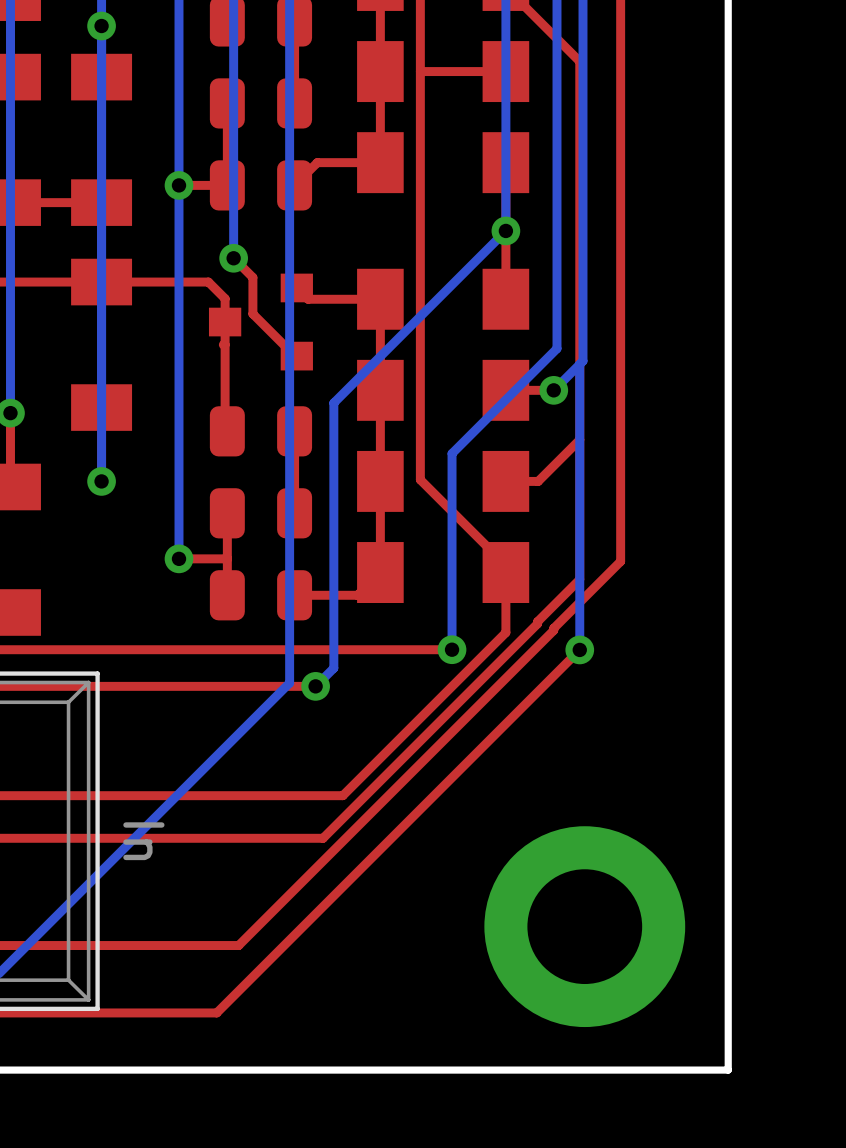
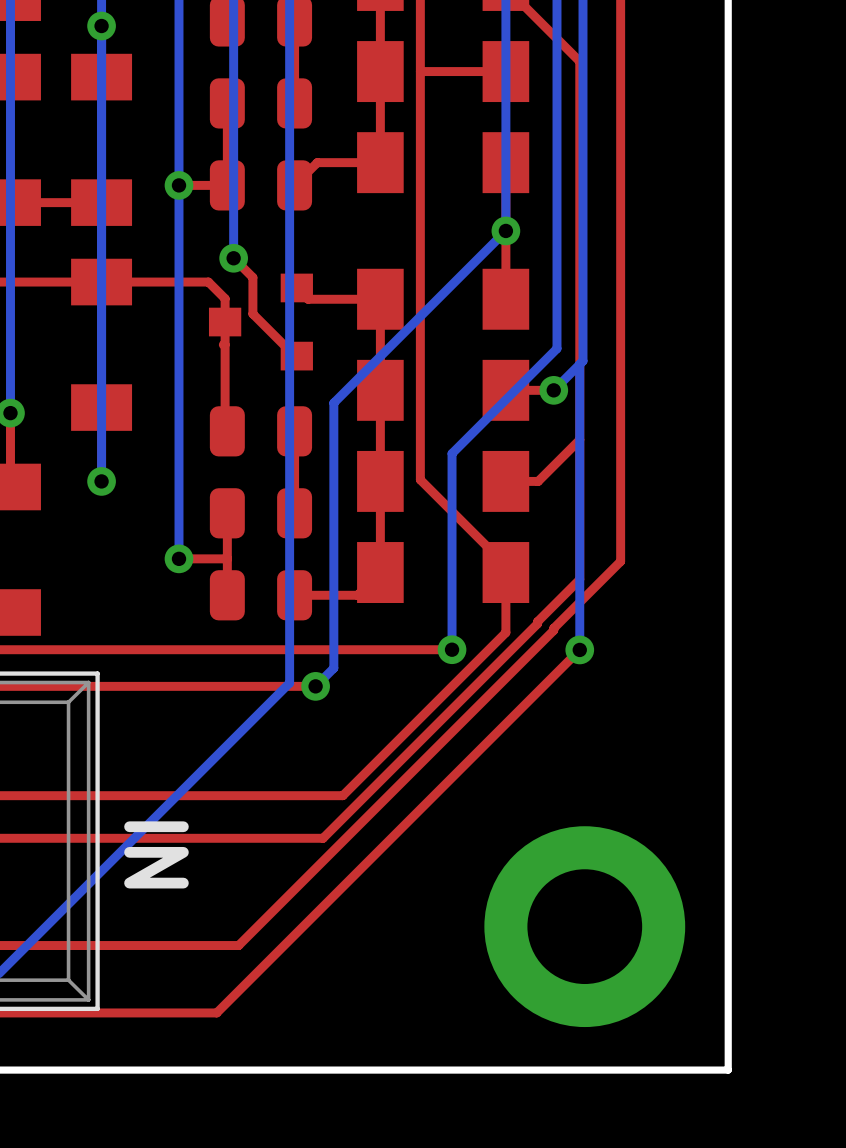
part value: In (143, 841) -> none
text: none -> IN (156, 854)

